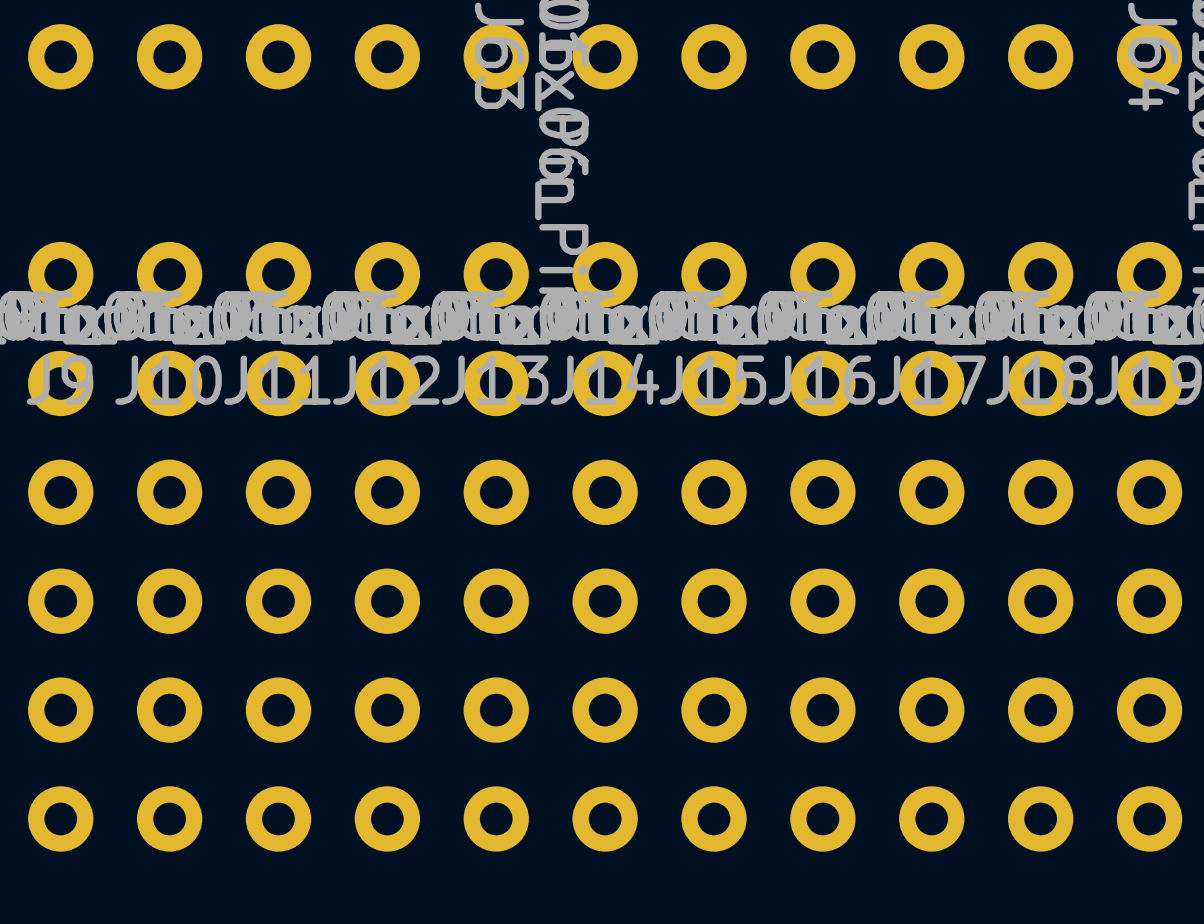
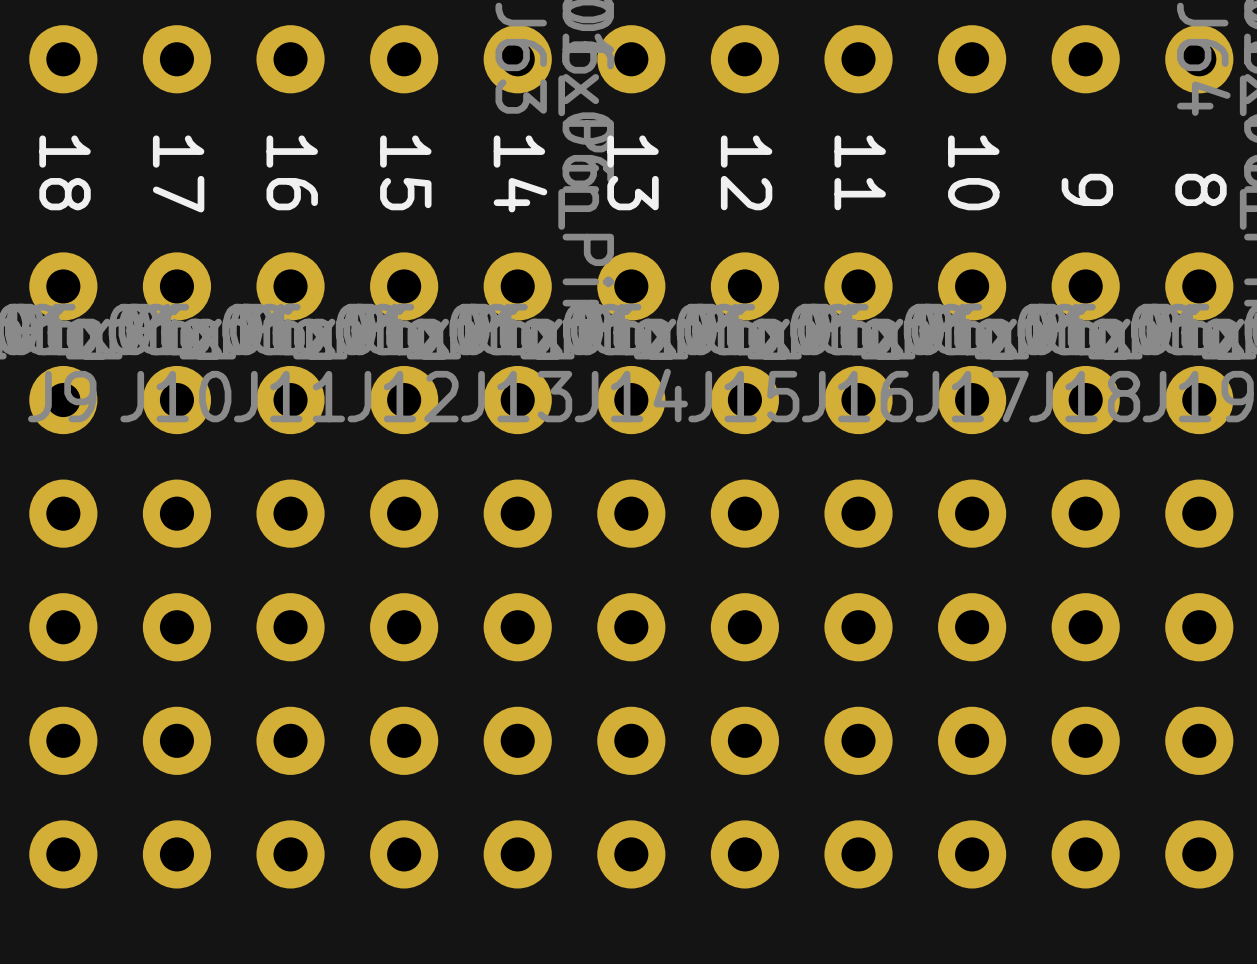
text: none -> 18 (65, 172)
text: none -> 16 (292, 172)
text: none -> 15 (405, 172)
text: none -> 13 (632, 172)
text: none -> 12 (746, 172)
text: none -> 11 (860, 172)
text: none -> 10 (973, 172)
text: none -> 17 (178, 173)
text: none -> 14 (520, 173)
text: none -> 9 (1087, 189)
text: none -> 8 (1200, 189)

